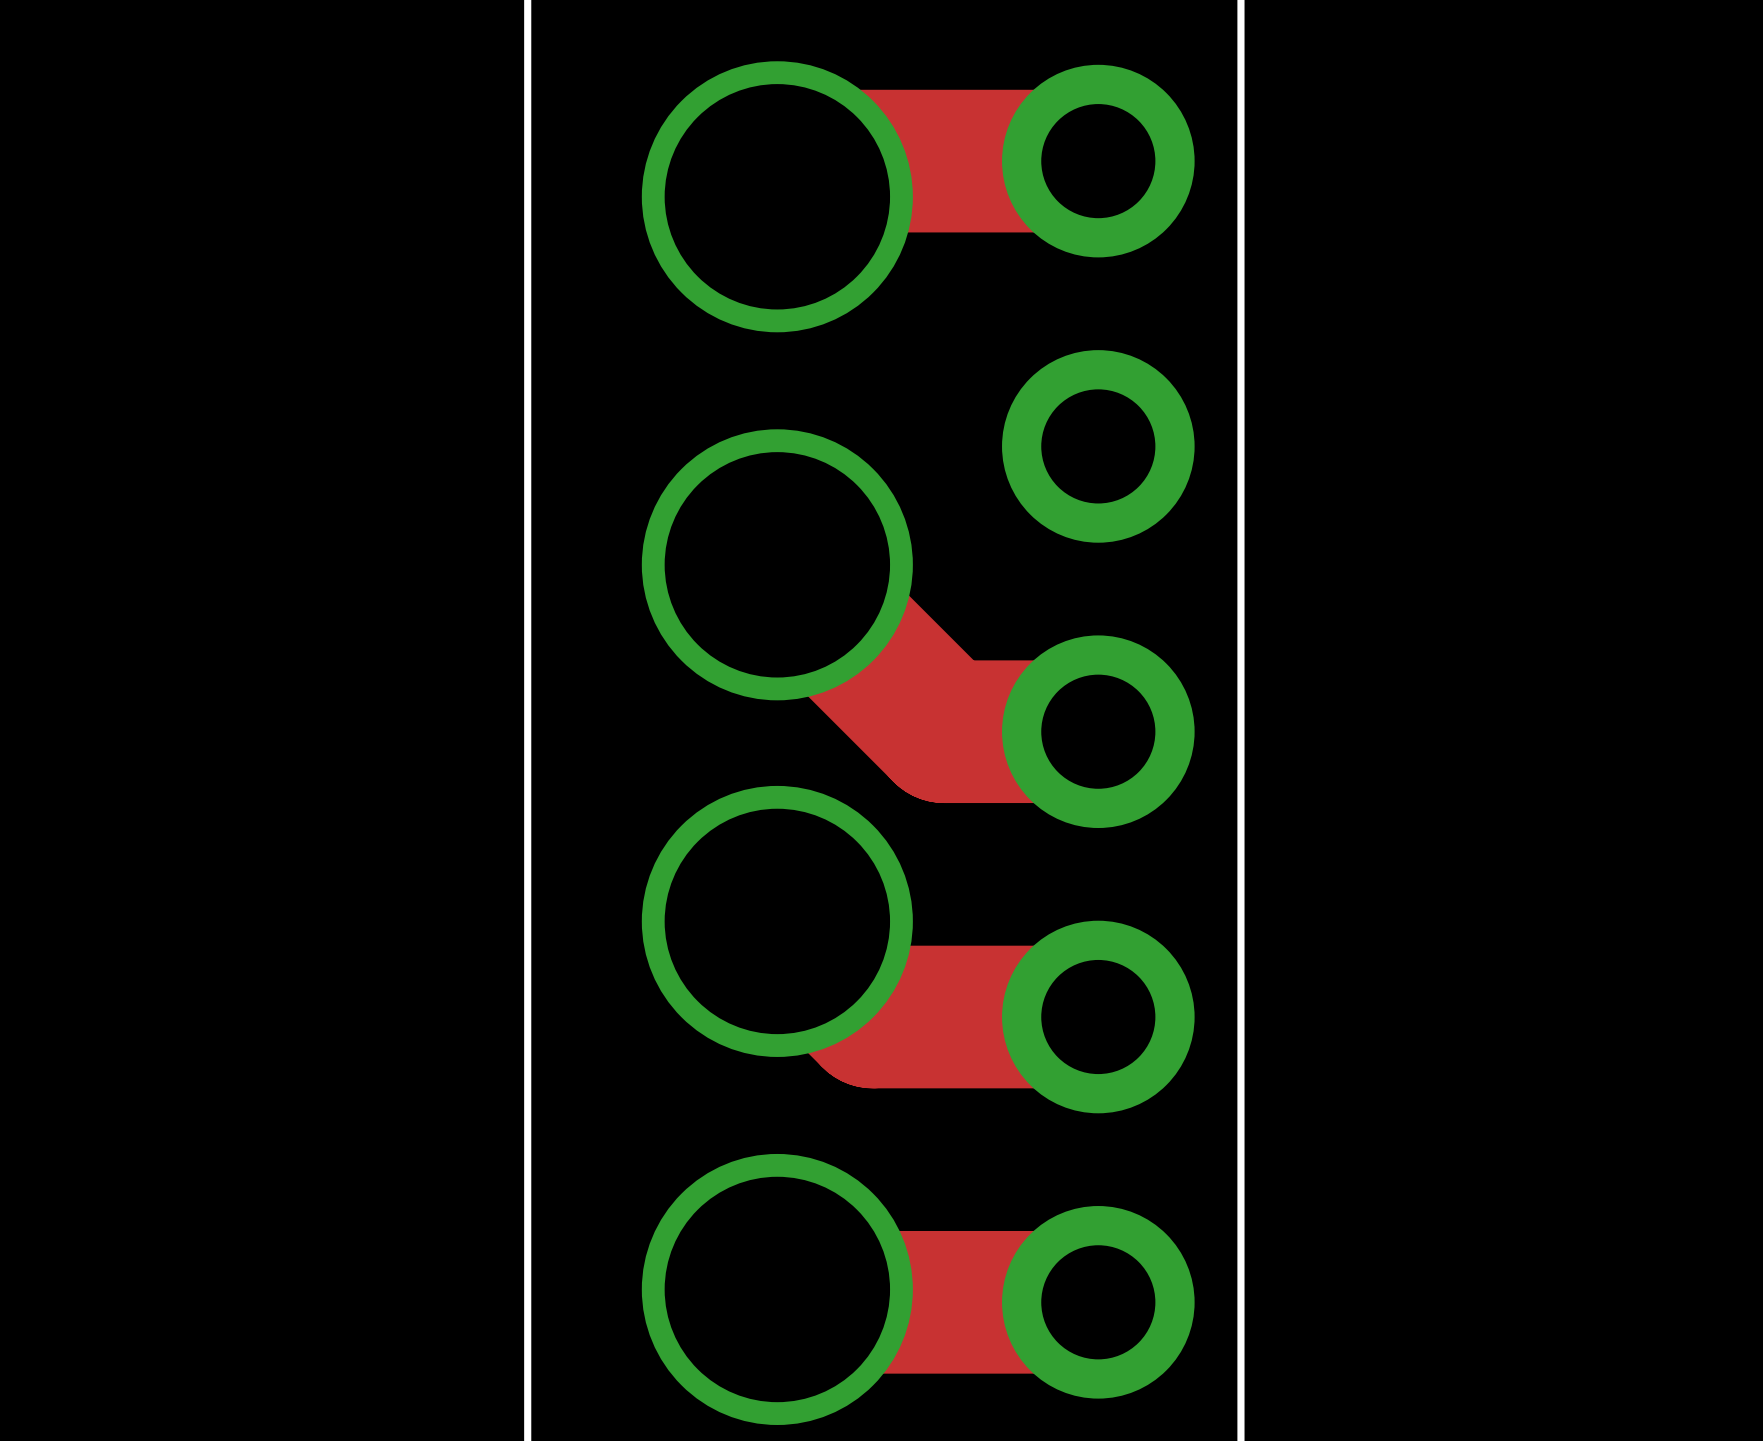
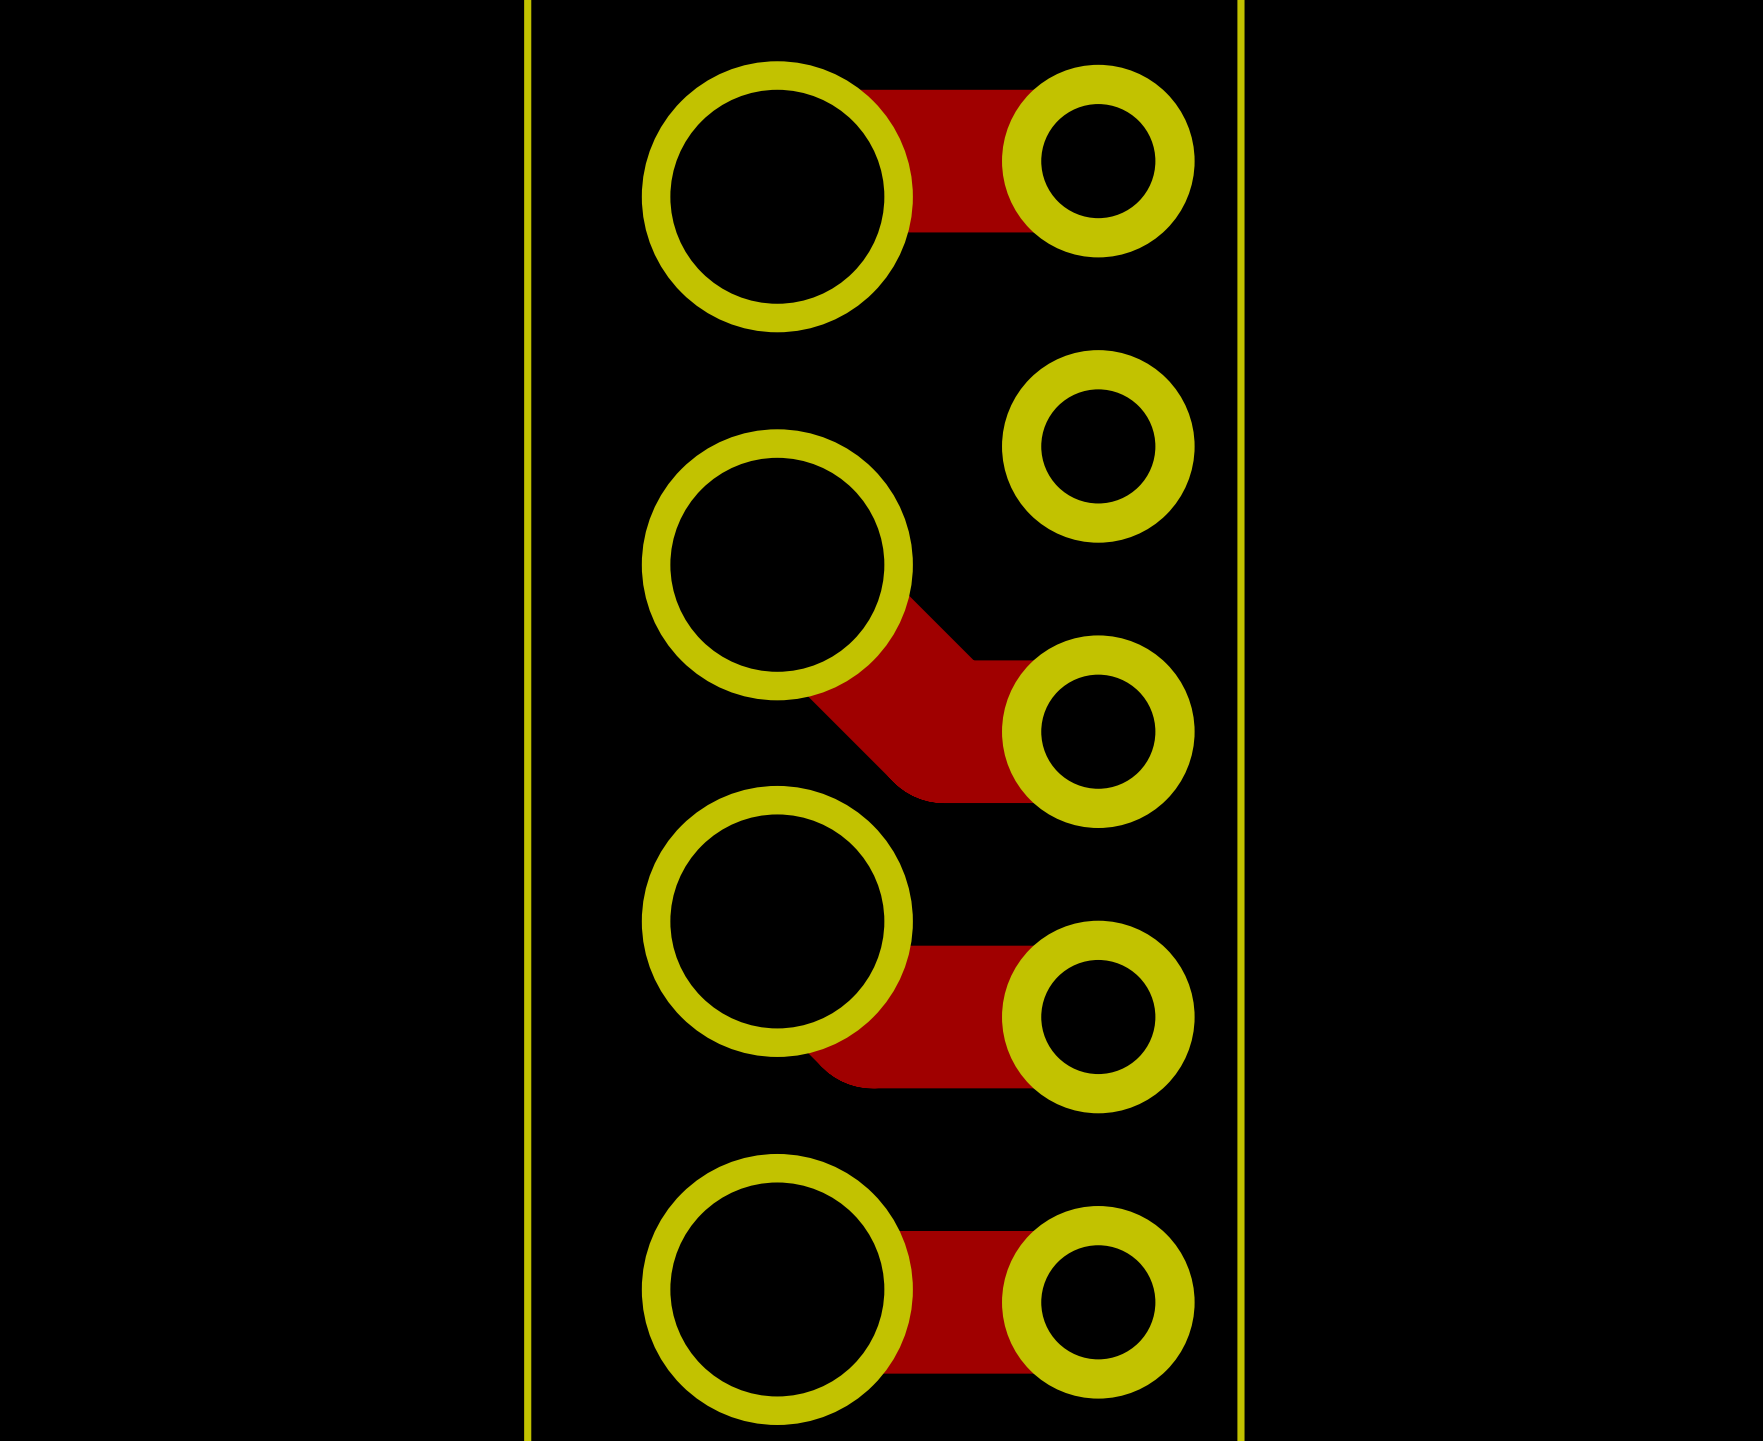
part footprint: [641, 61, 913, 333] -> [641, 61, 913, 333]
part footprint: [641, 429, 913, 701] -> [641, 429, 913, 701]
part footprint: [641, 785, 913, 1057] -> [641, 785, 913, 1057]
part footprint: [641, 1153, 913, 1425] -> [641, 1153, 913, 1425]

